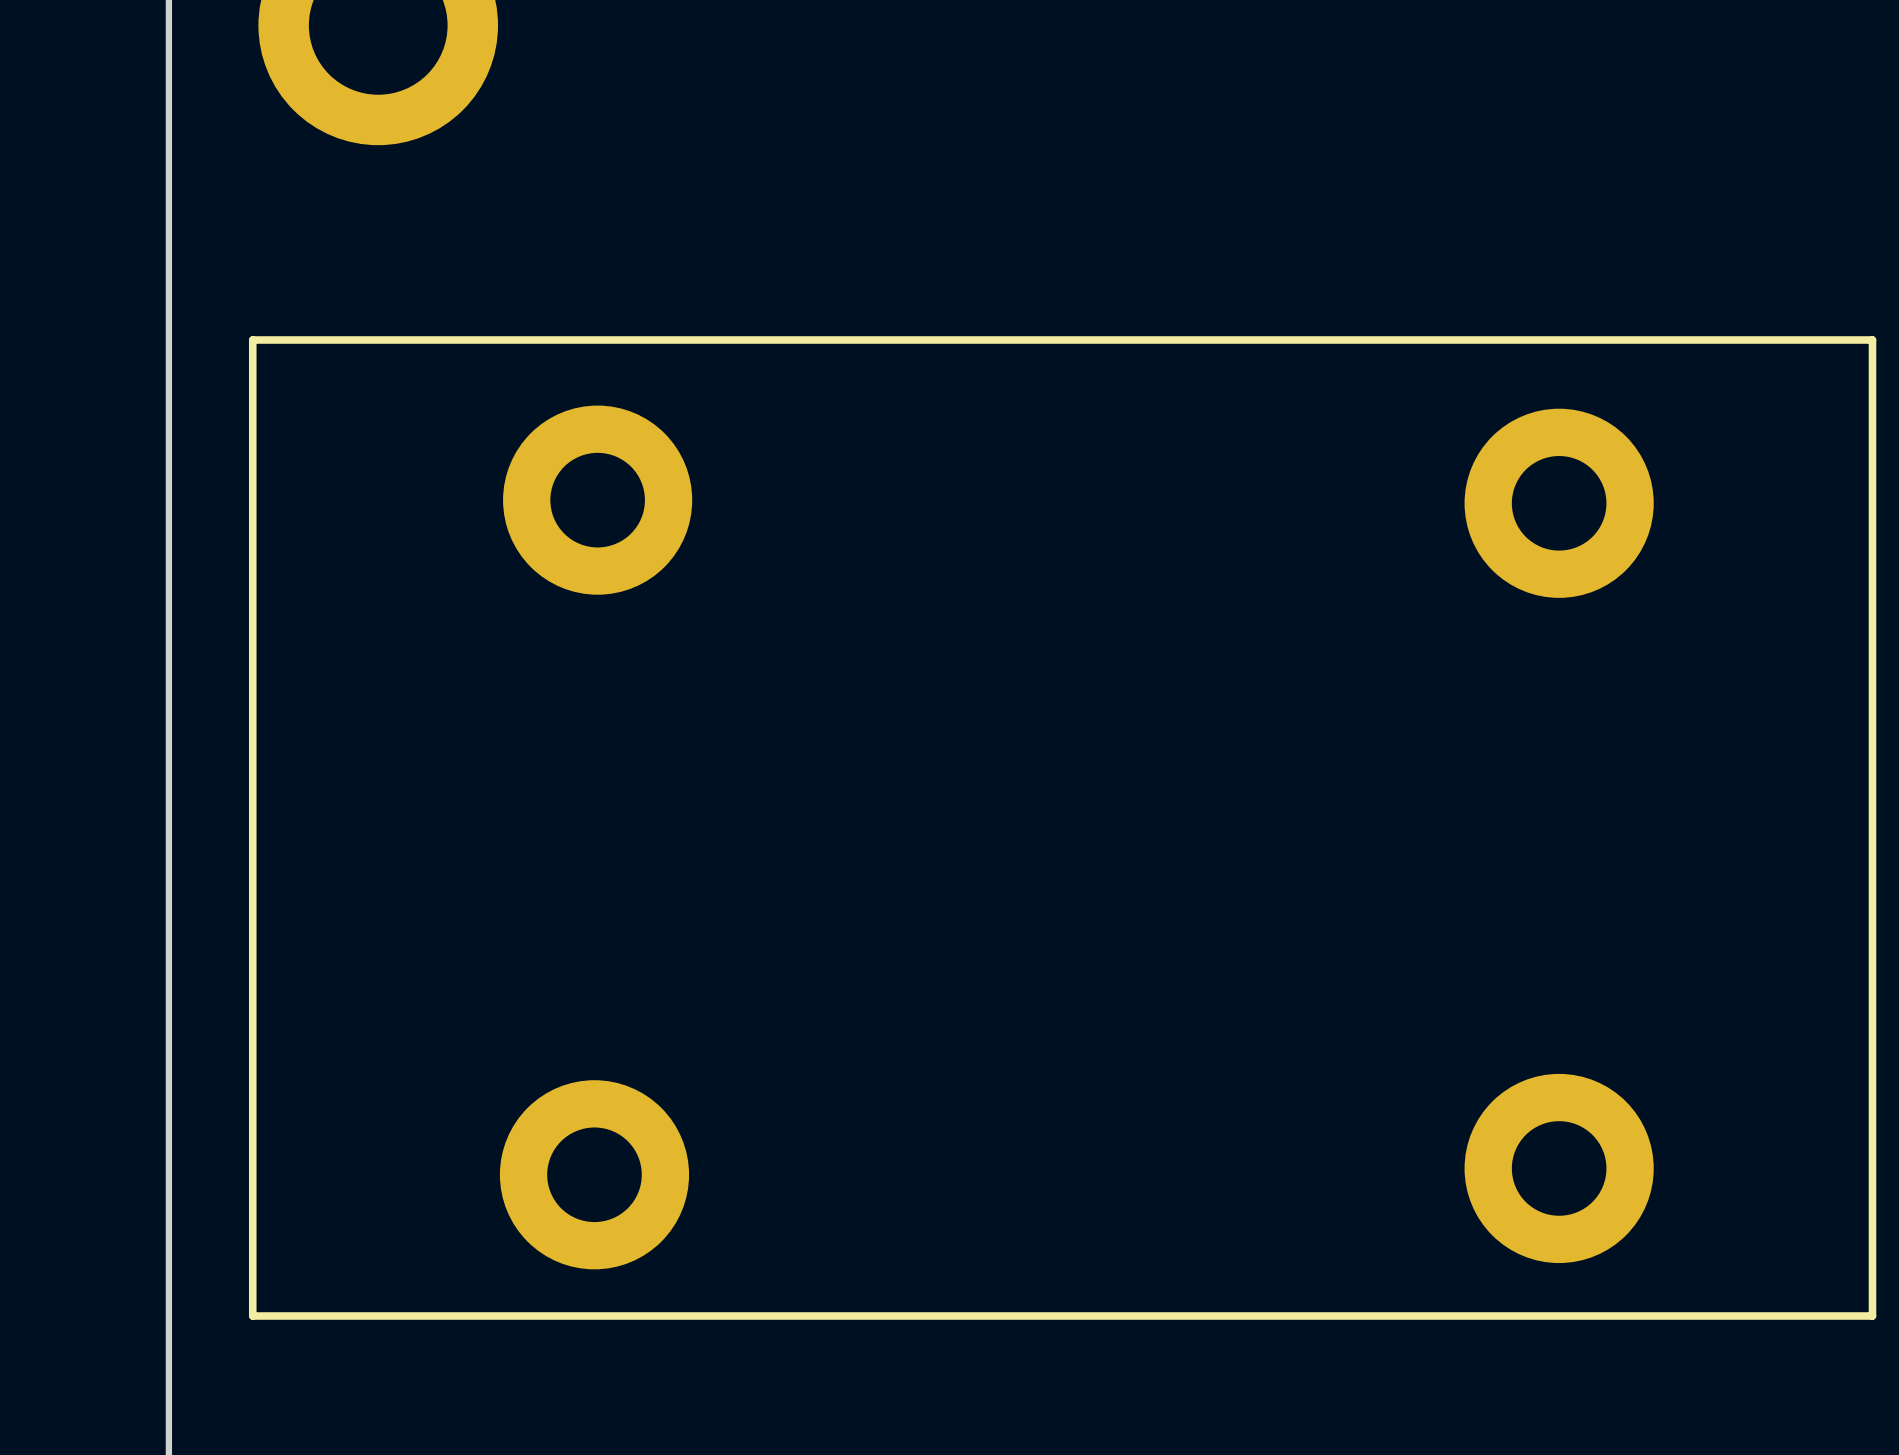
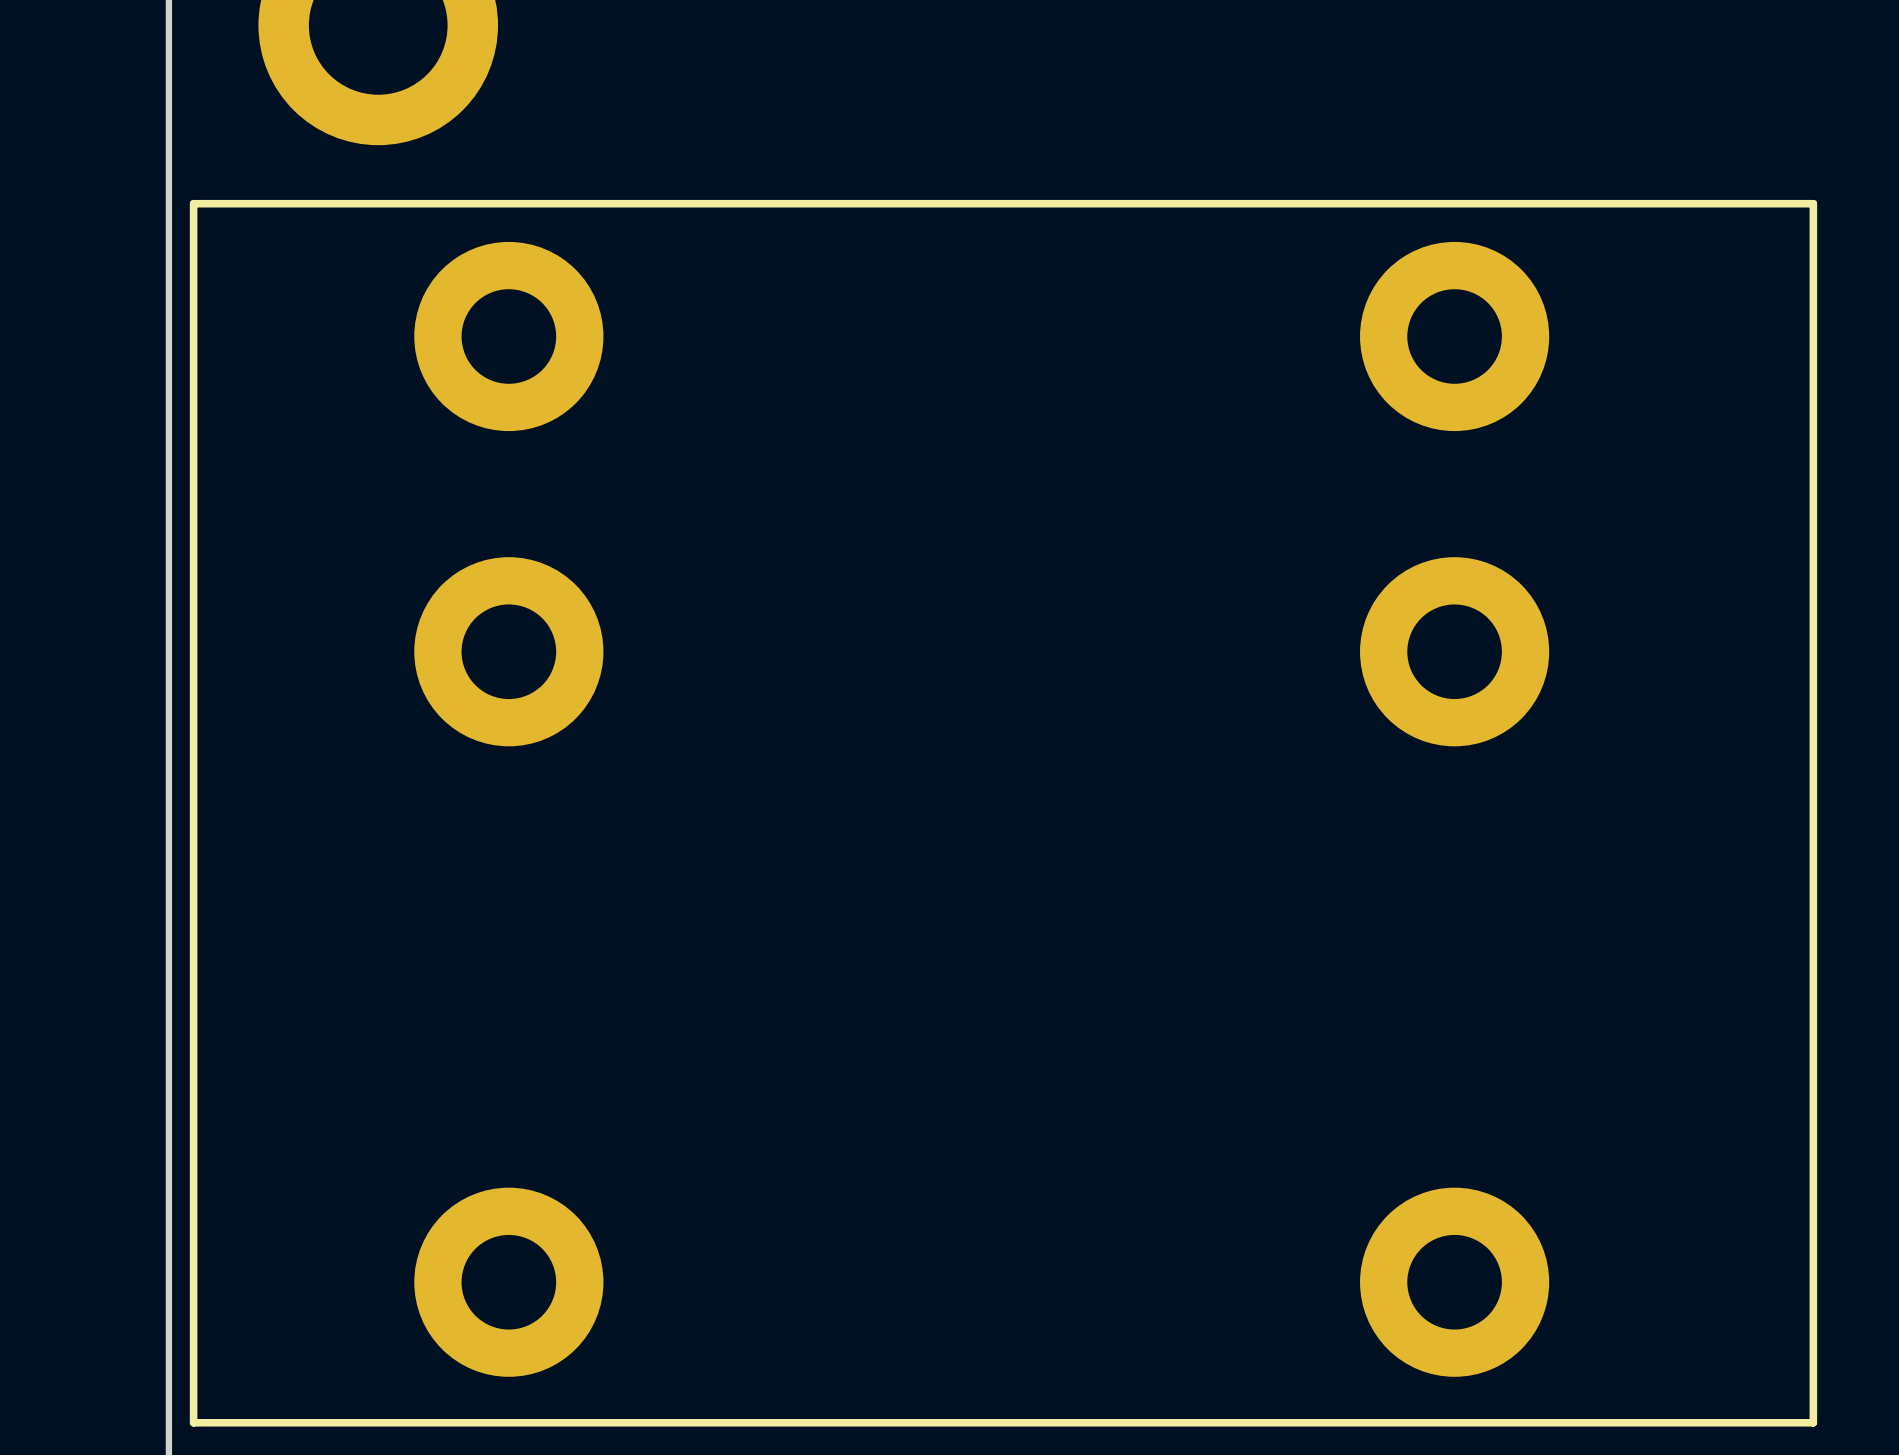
part footprint: [248, 336, 1877, 1320] -> [189, 199, 1818, 1427]

